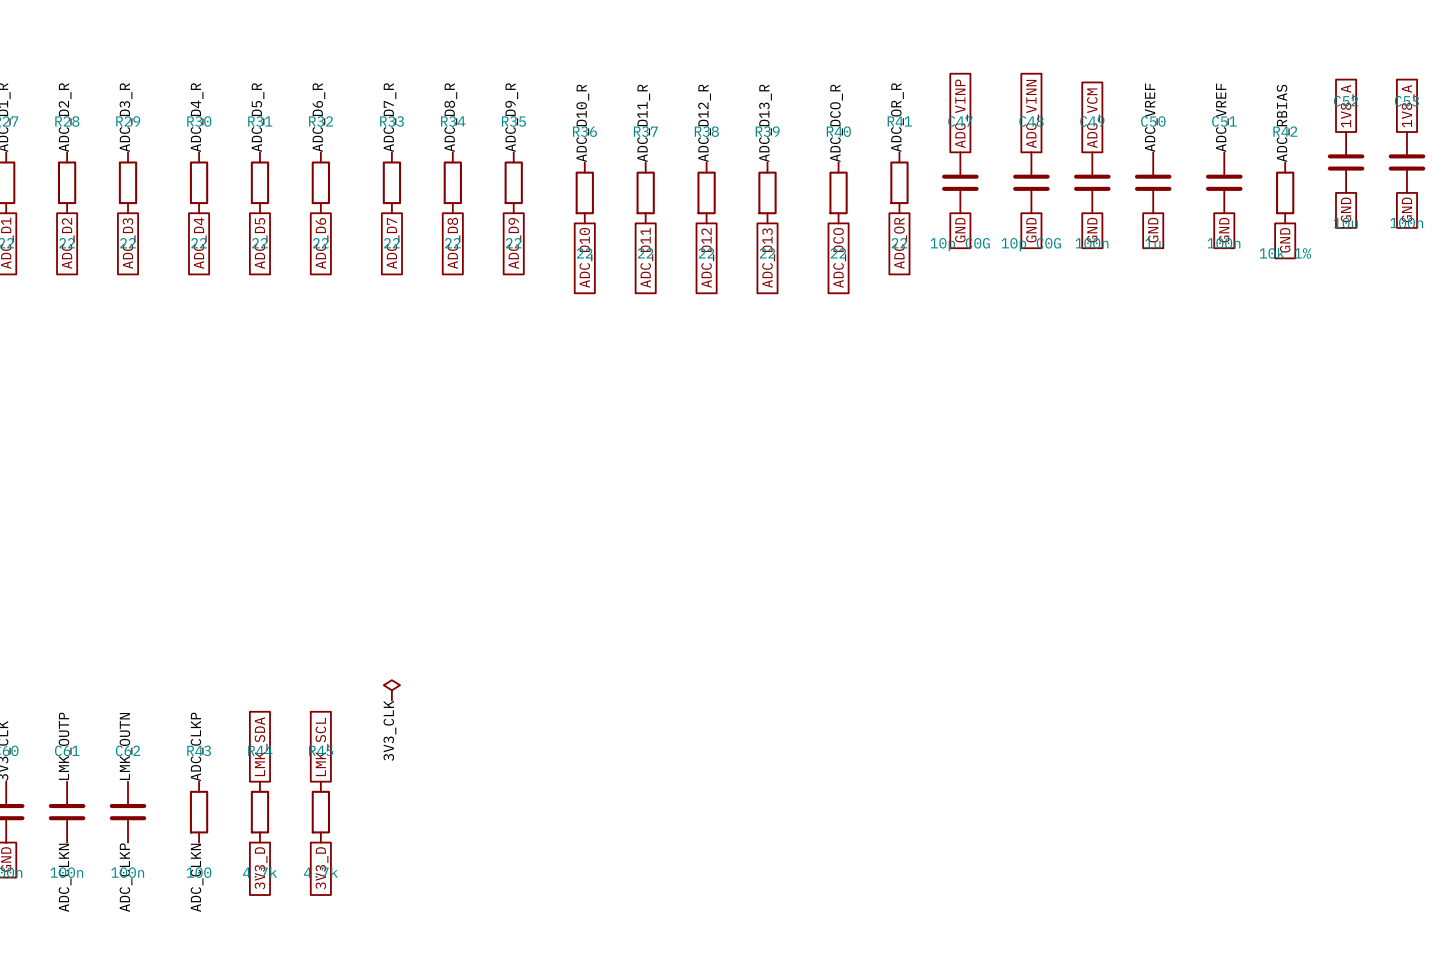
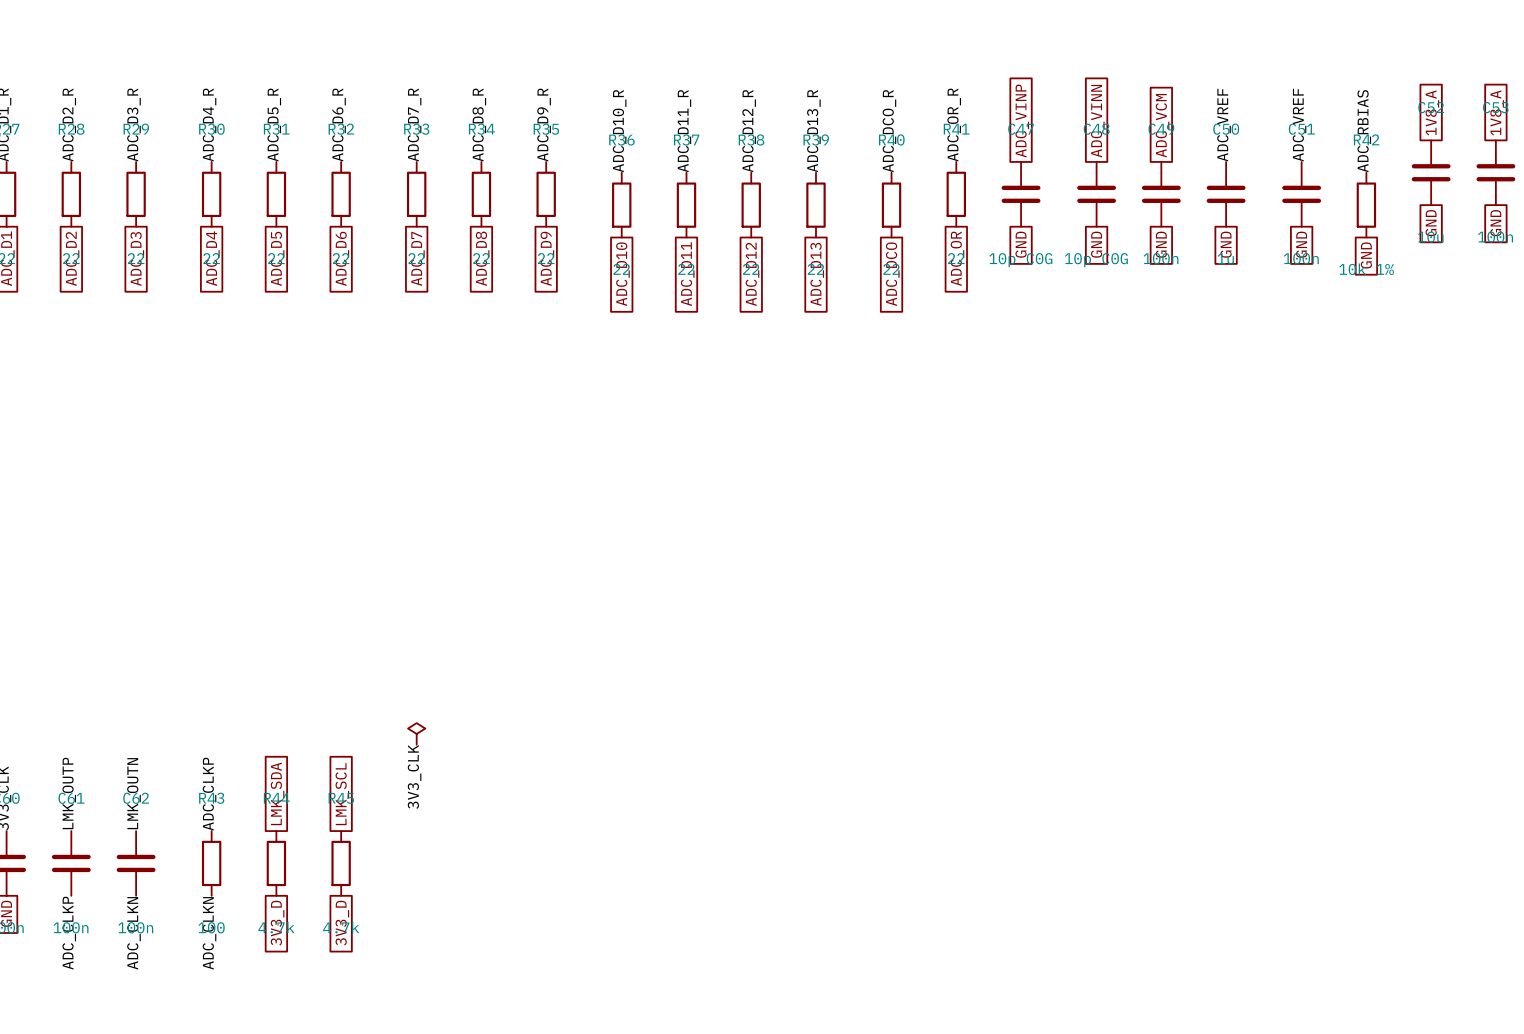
label: ADC_CLKN (65, 877) -> ADC_CLKP (69, 933)
label: ADC_CLKP (126, 877) -> ADC_CLKN (133, 933)

